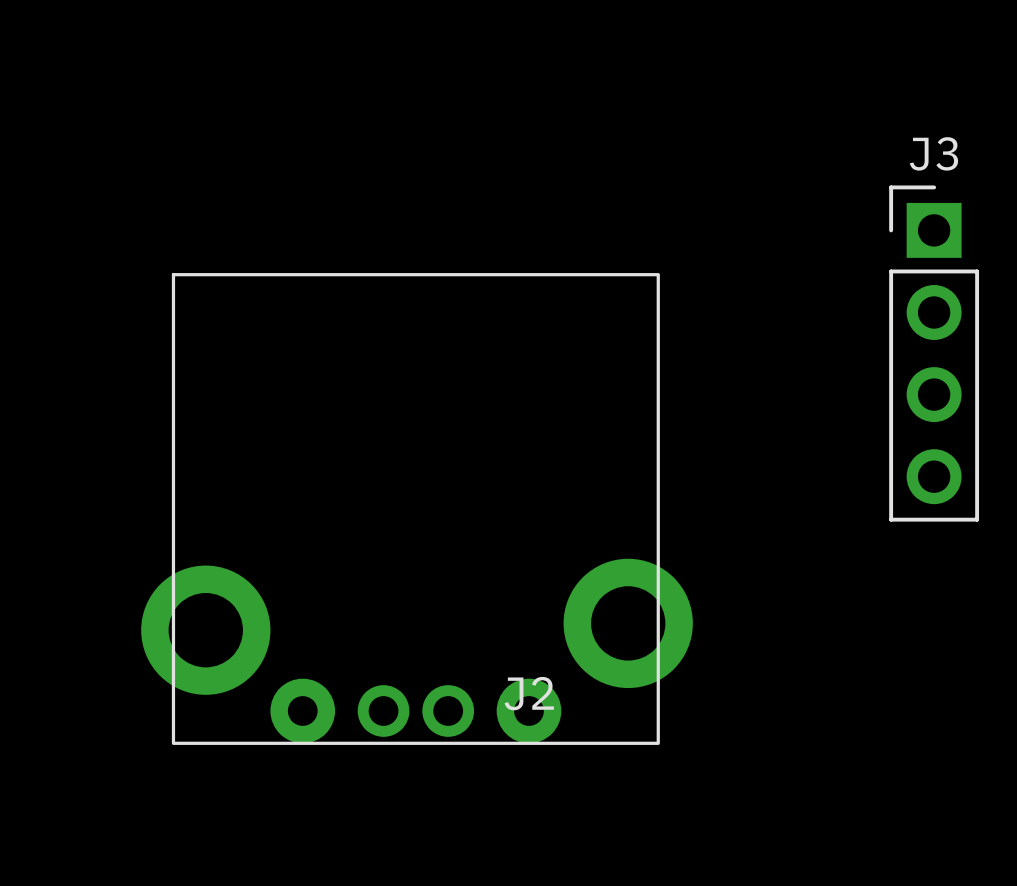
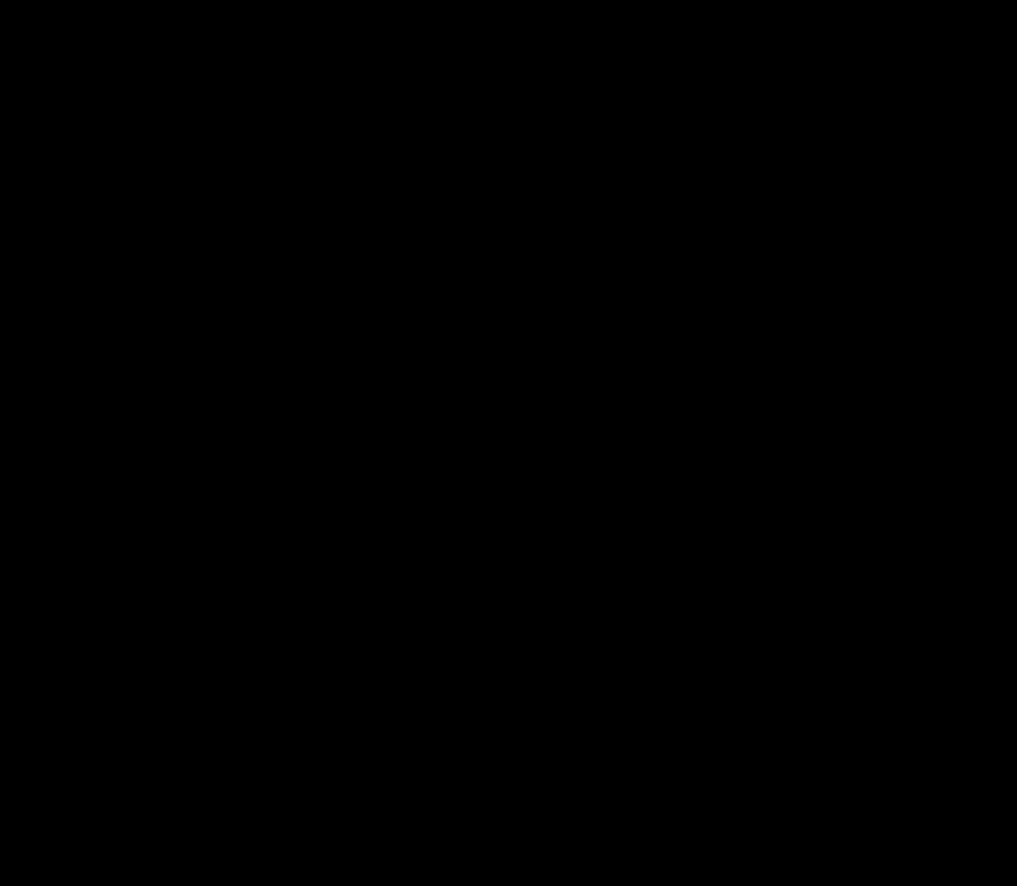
J3: (934, 353) -> none
J2: (417, 508) -> none

